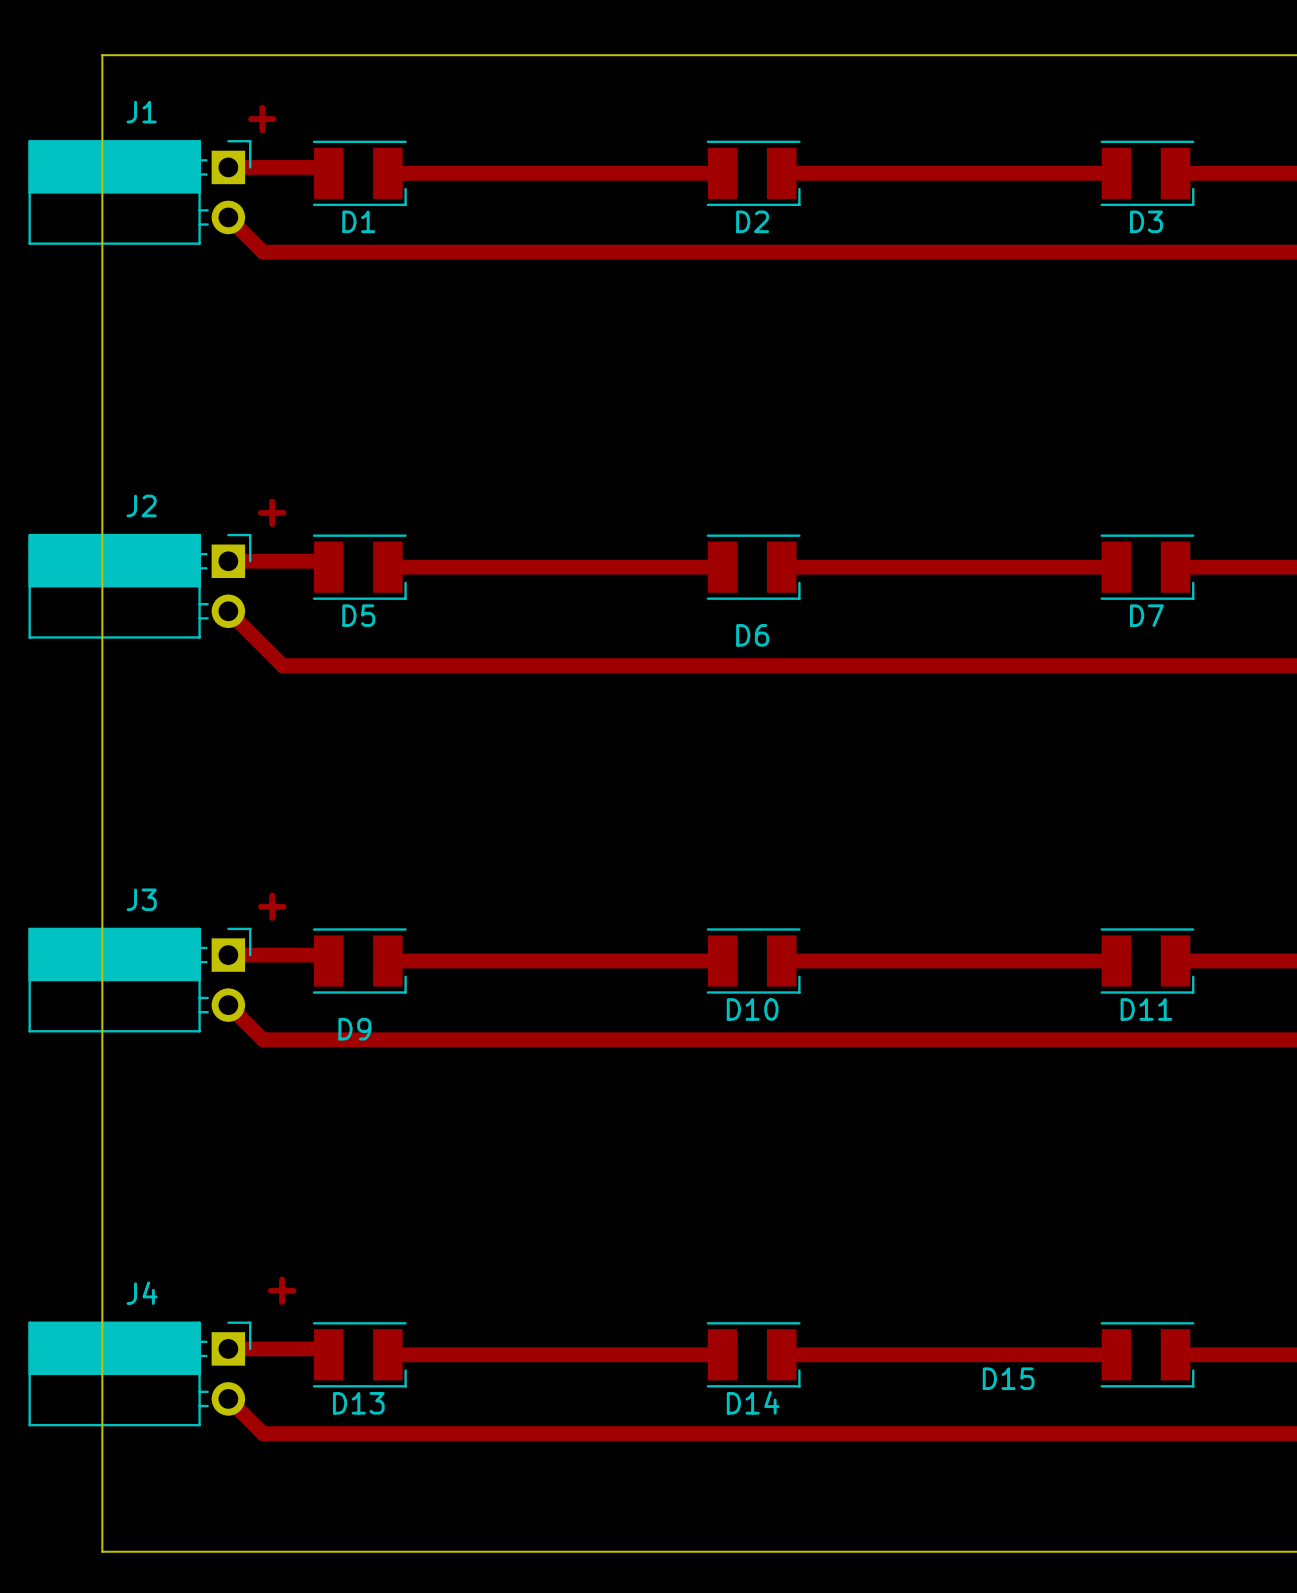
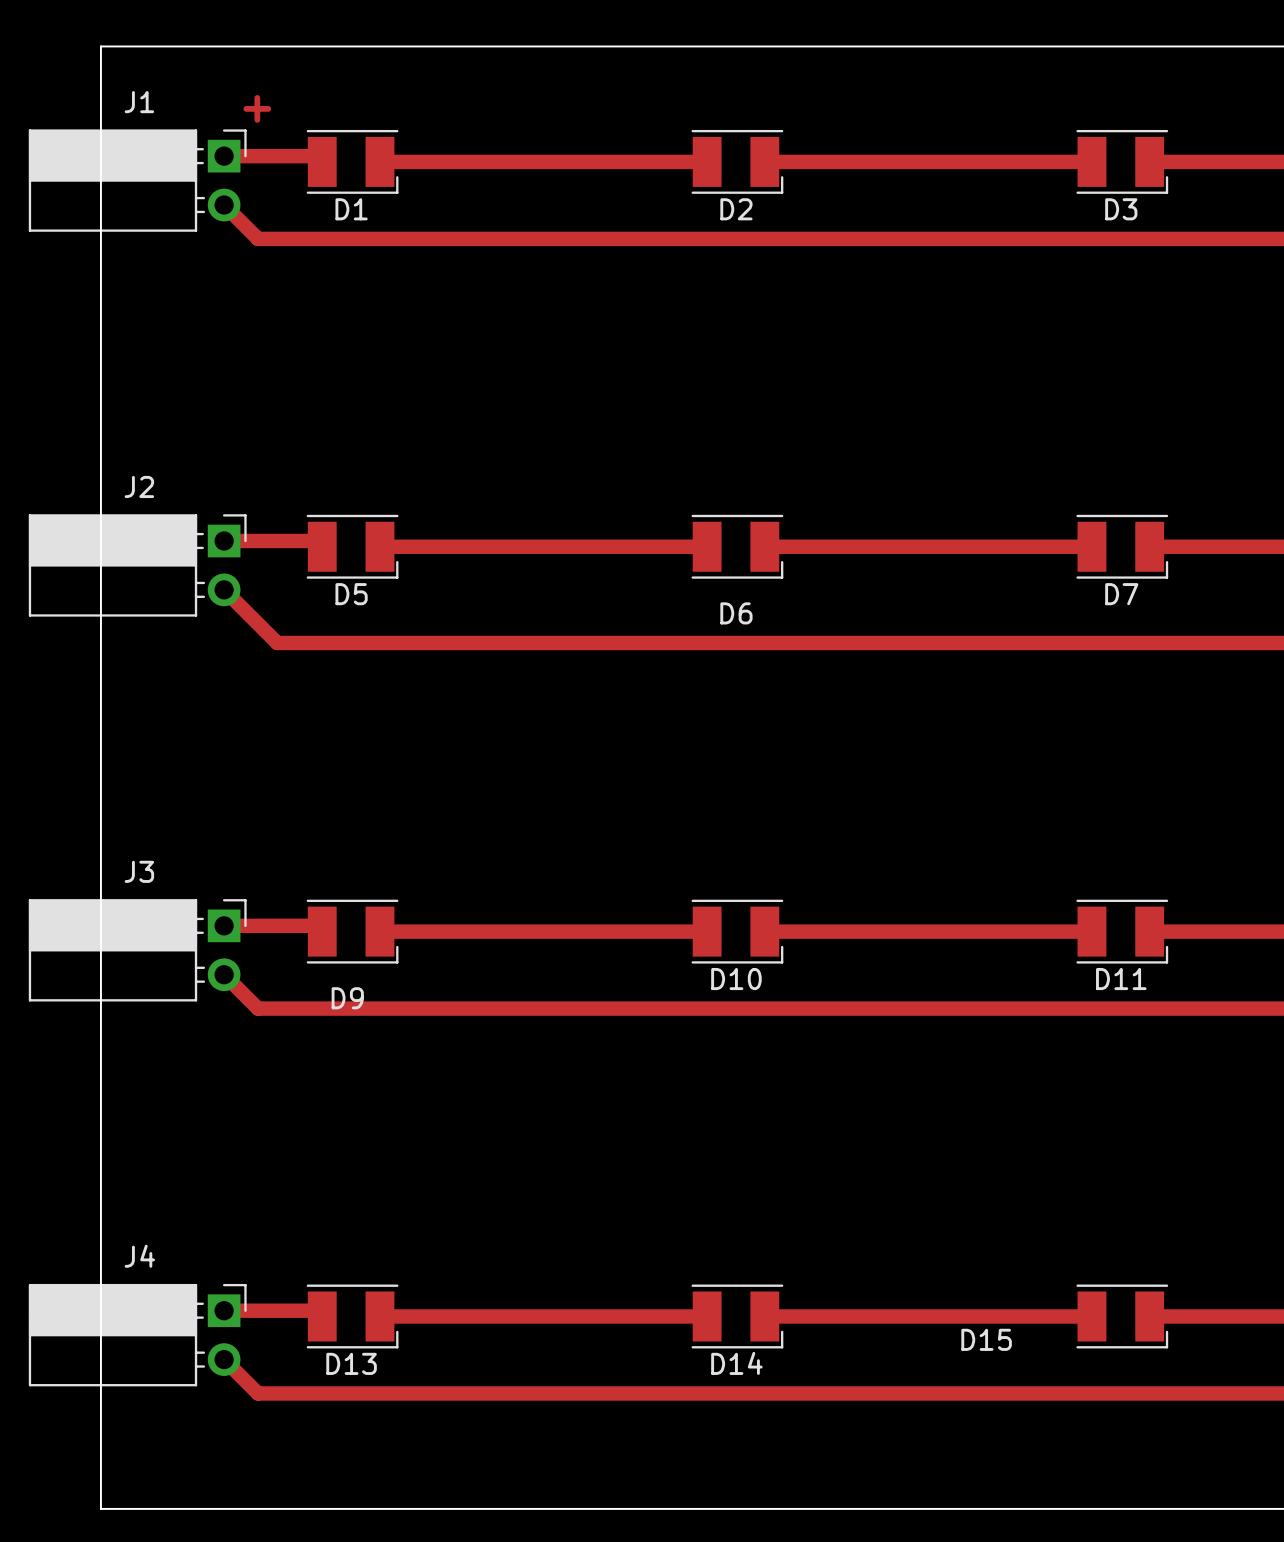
text: + (272, 512) -> none
text: + (272, 906) -> none
text: + (282, 1290) -> none

